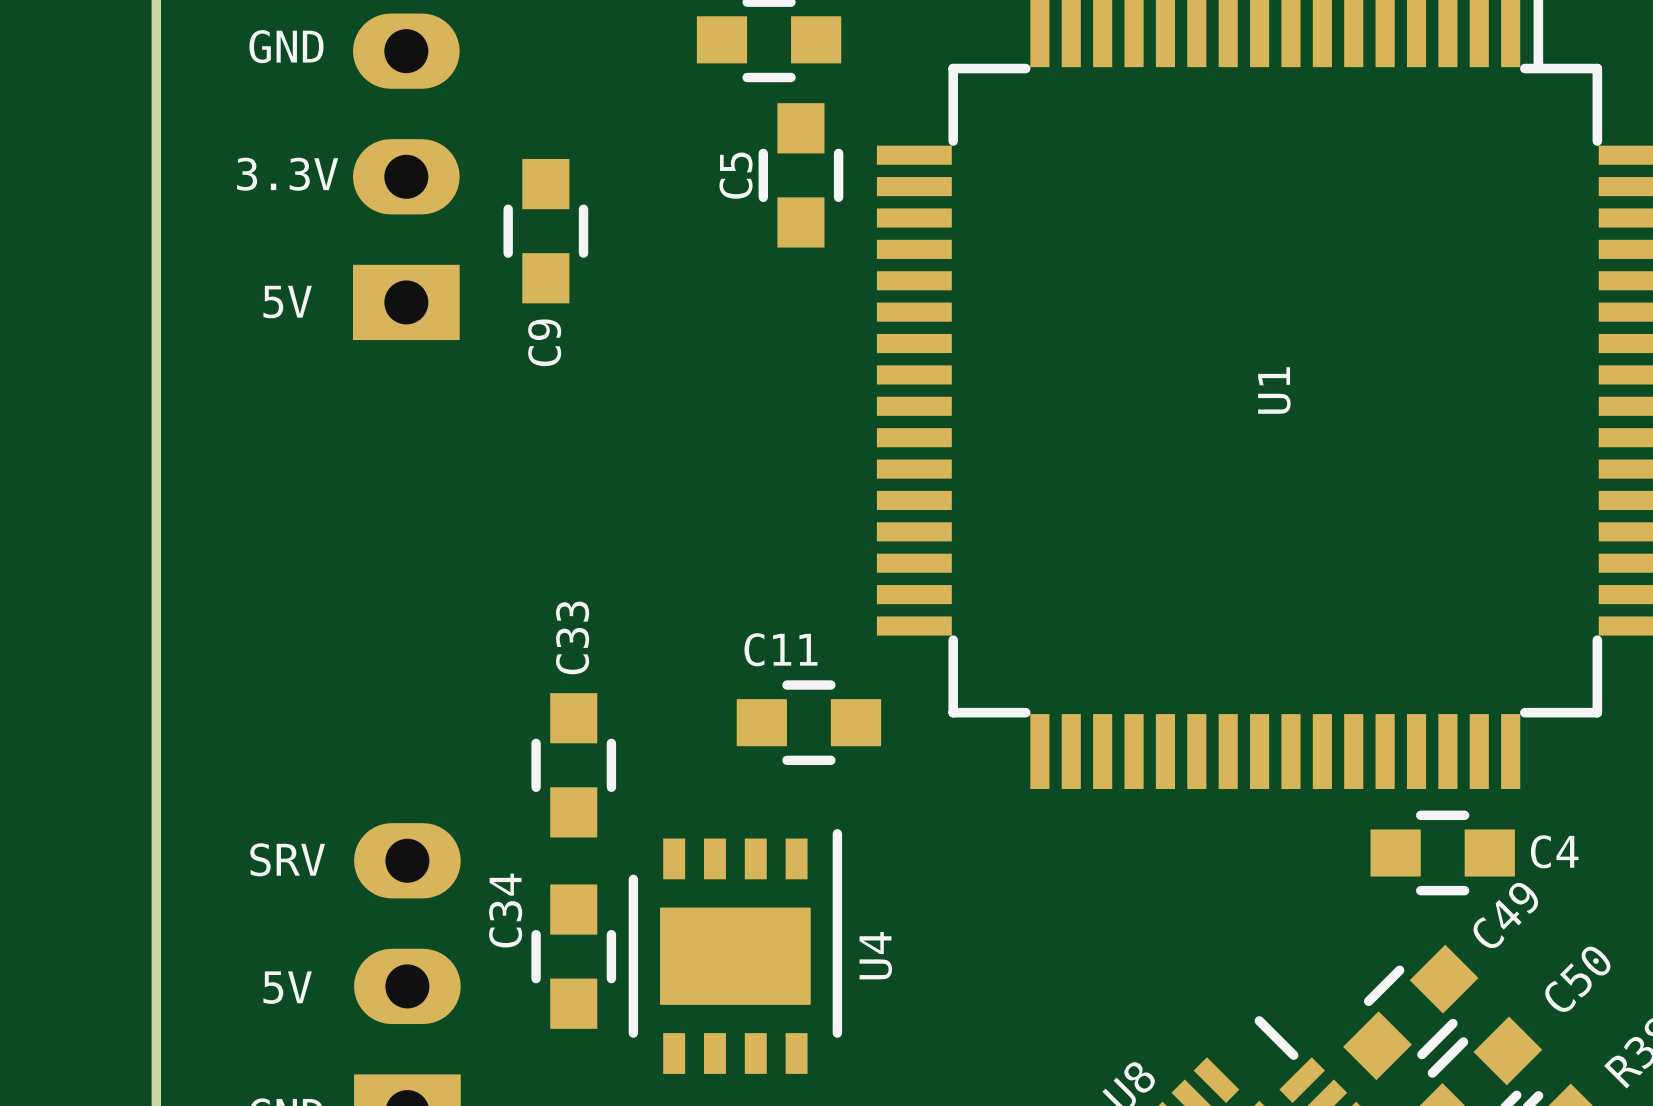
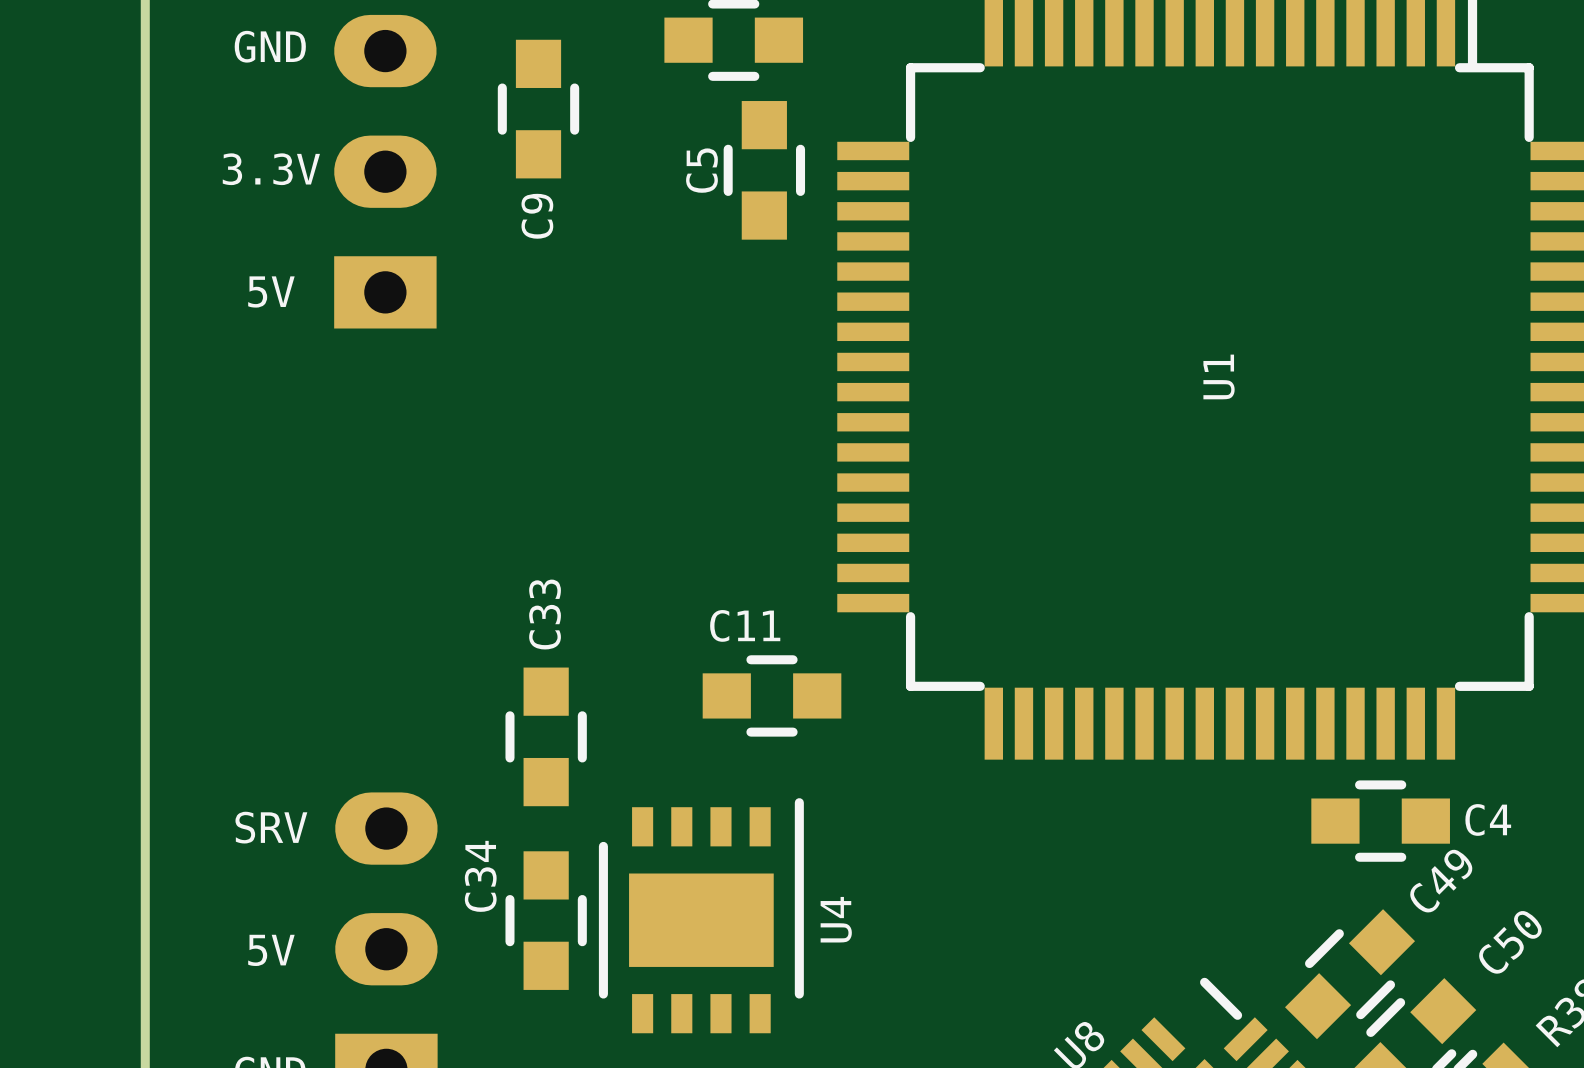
C9 position: (545, 231) -> (538, 109)

